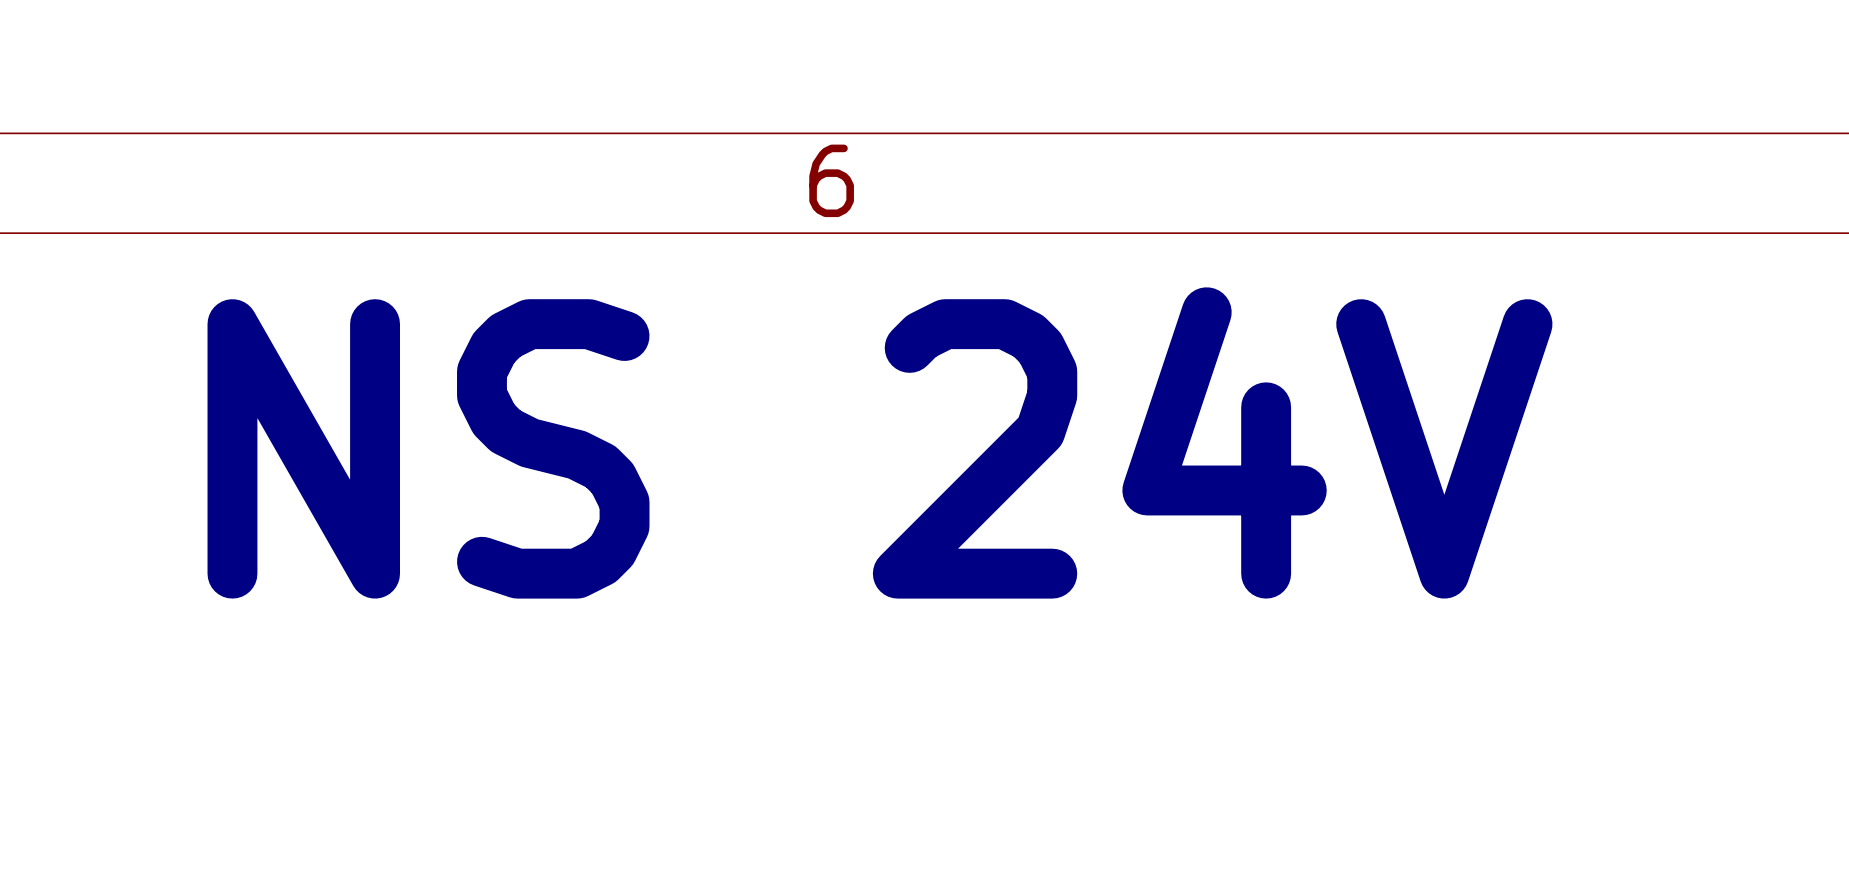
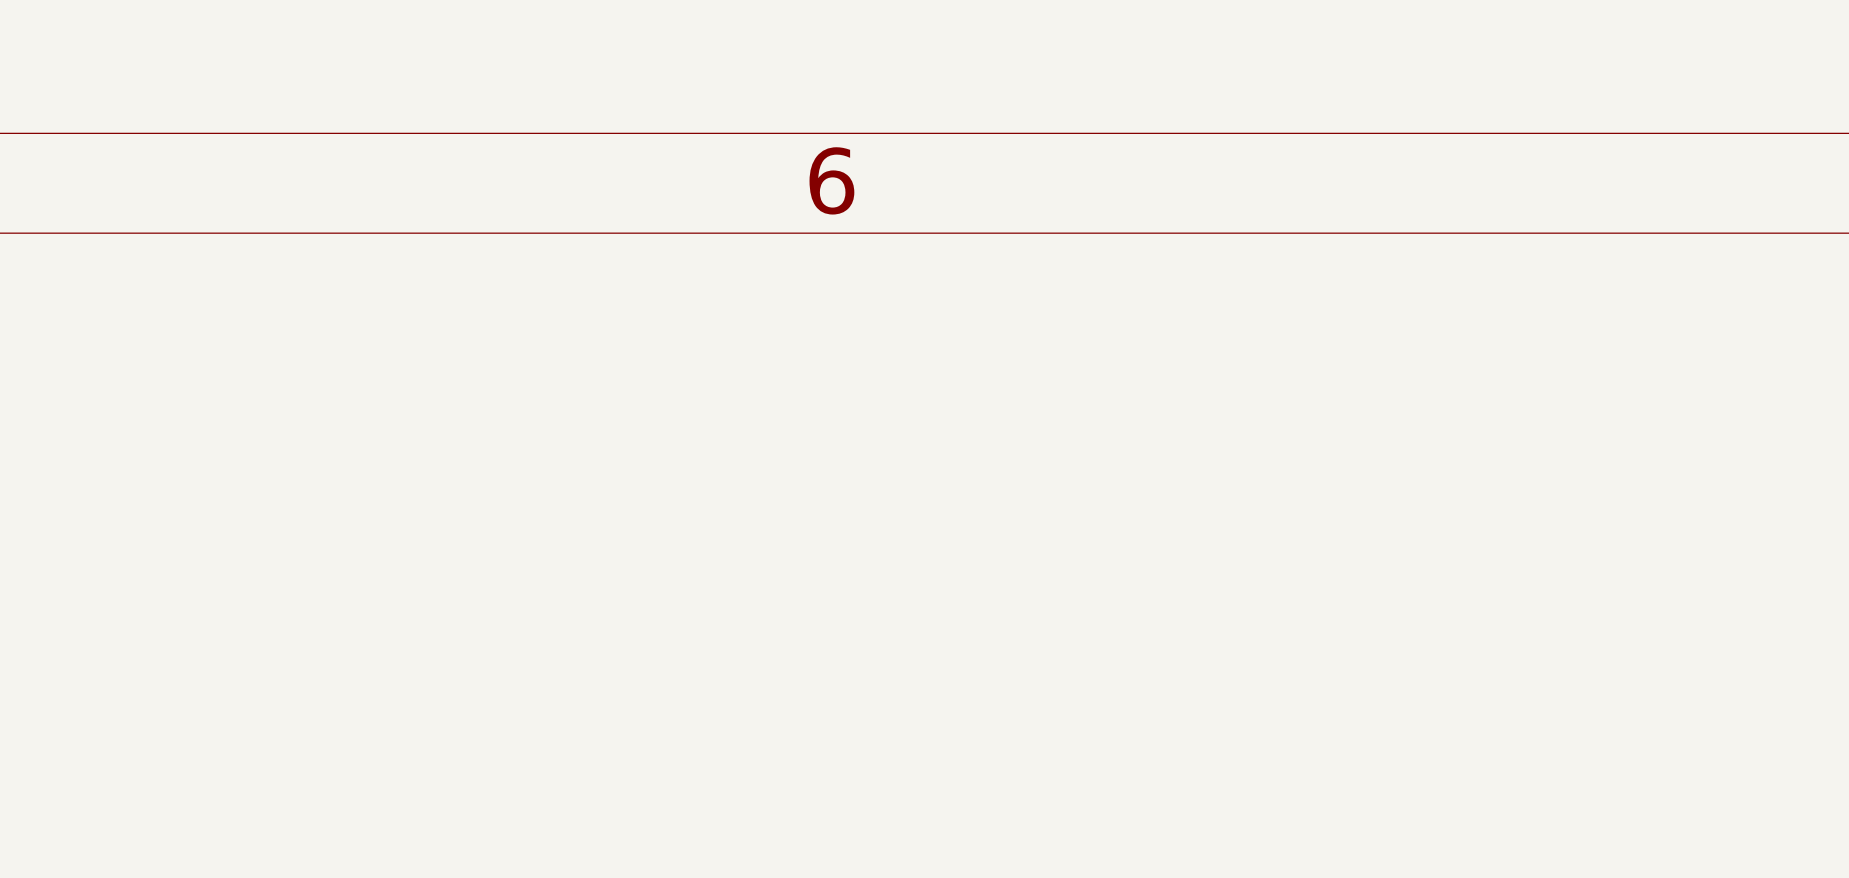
text: NS 24V (879, 442) -> none

